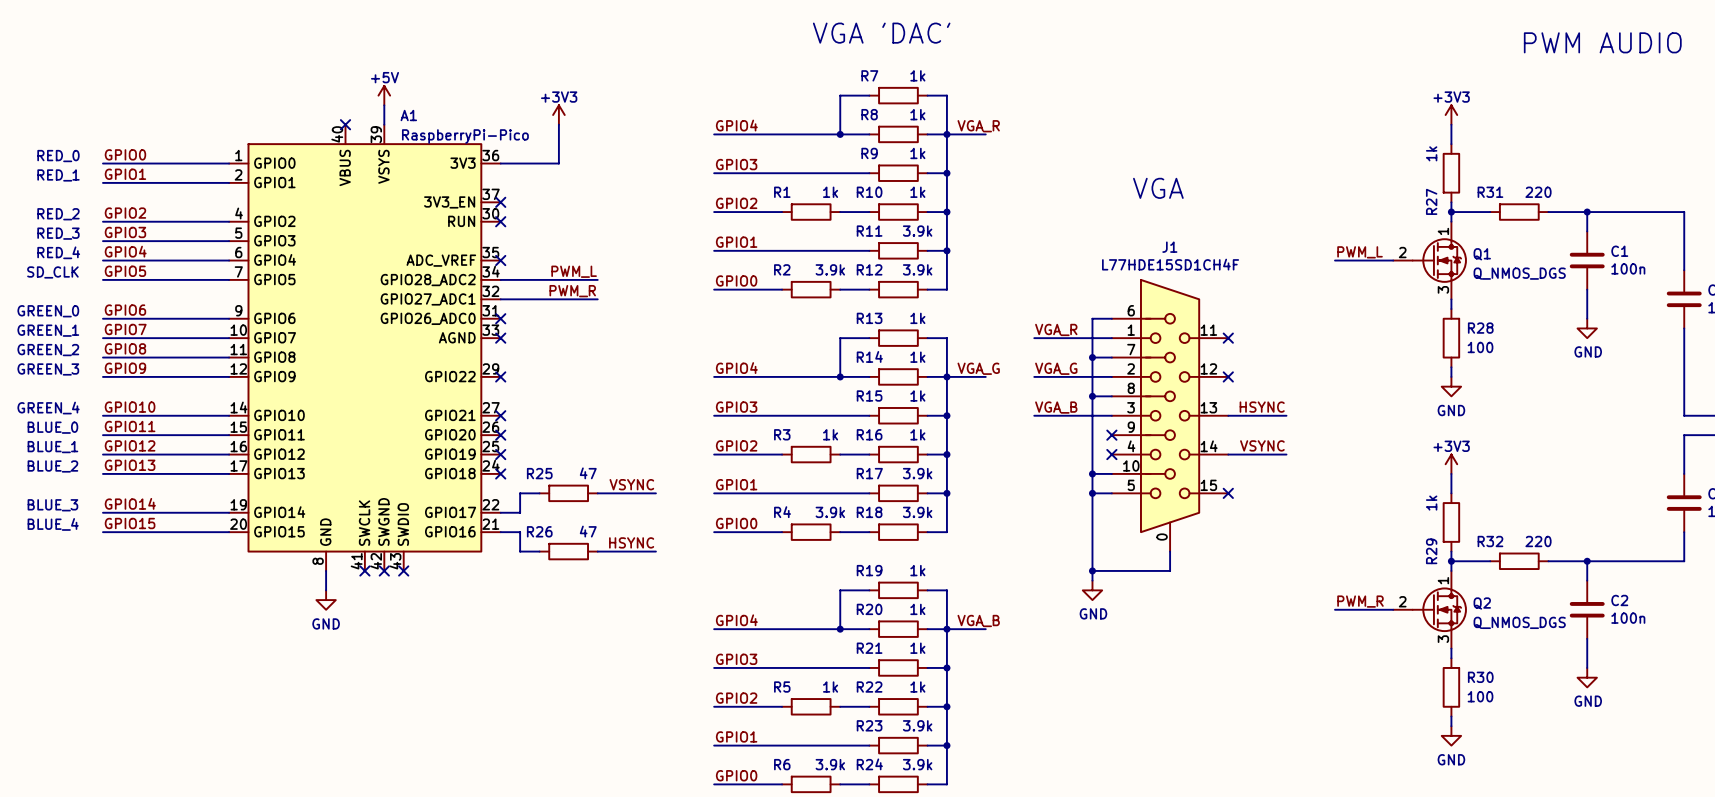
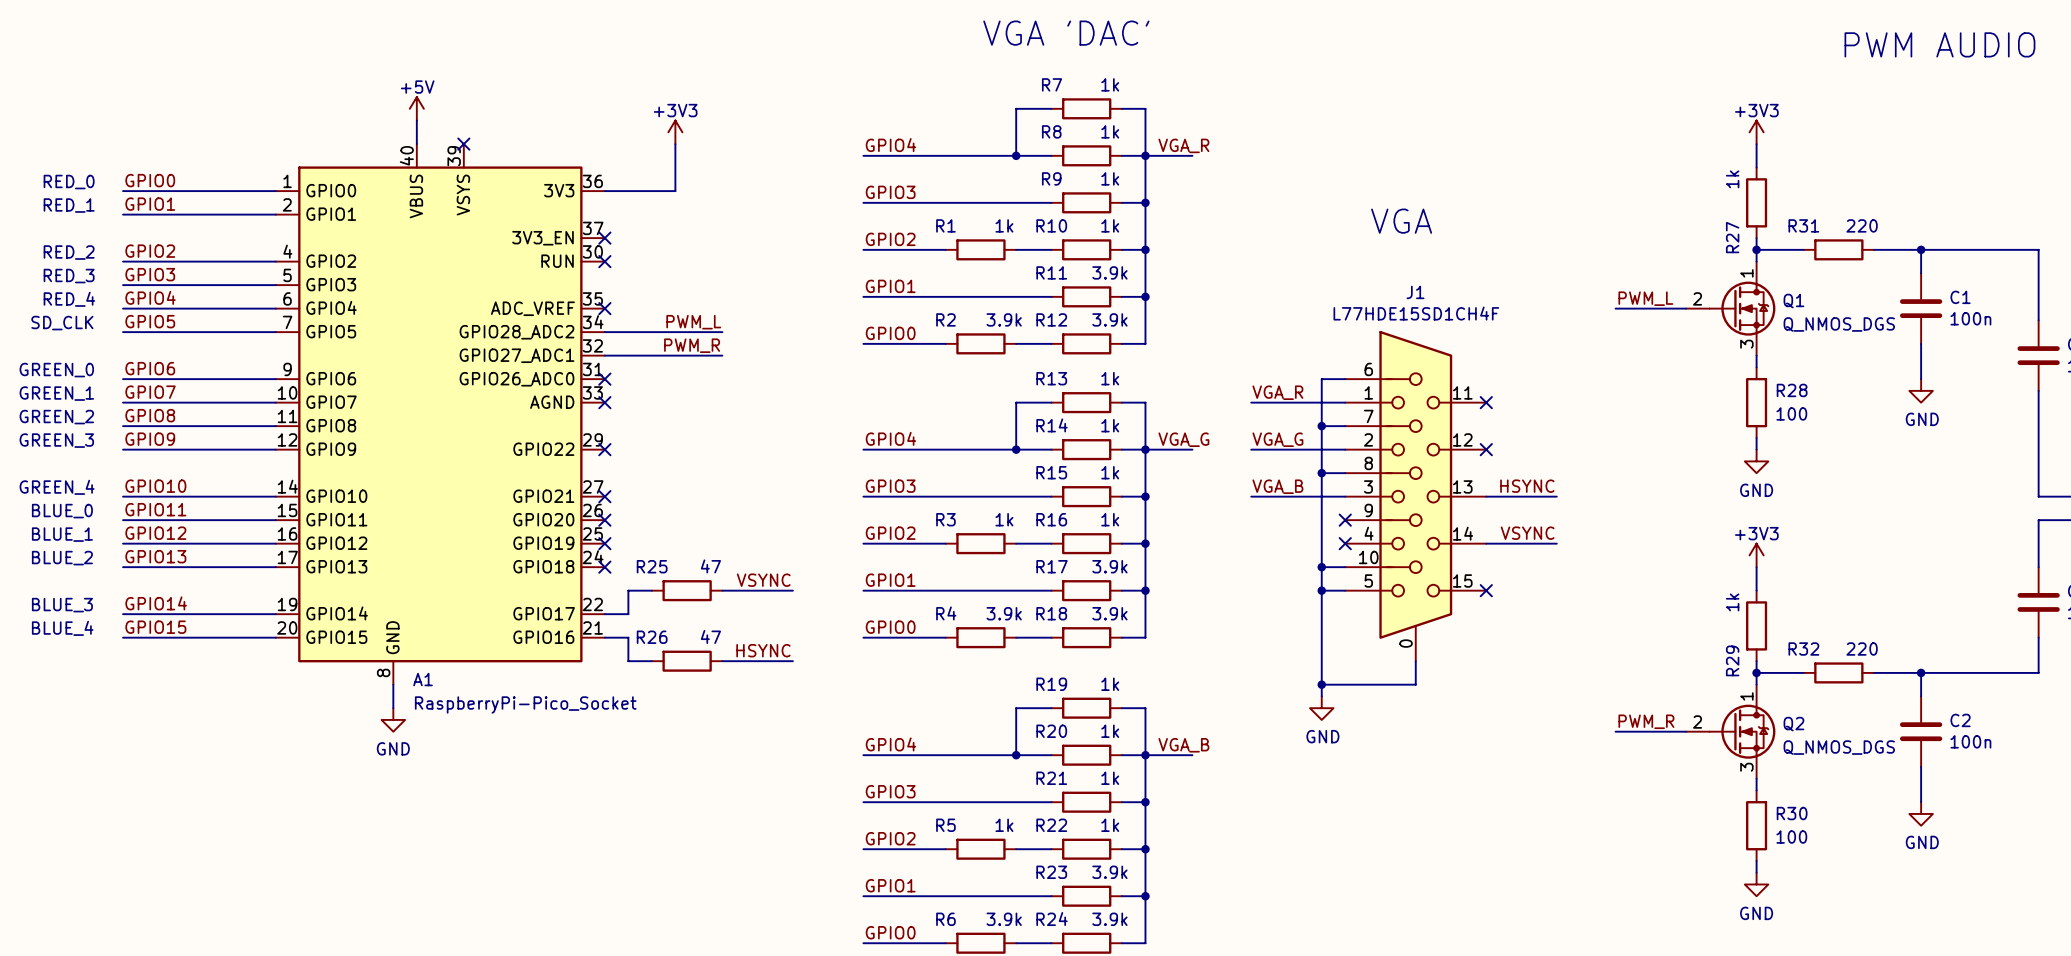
power symbol position: +5V (384, 95) -> +5V (416, 108)
wire: (384, 105) (384, 124) -> (416, 120) (416, 144)
A1 name position: A1 (408, 115) -> A1 (423, 679)
A1 symbol: [229, 124, 501, 571] -> [275, 144, 605, 685]
no-connect mark position: (345, 124) -> (463, 144)
A1 value: RaspberryPi-Pico (465, 136) -> RaspberryPi-Pico_Socket (525, 704)
no-connect mark: (364, 570) -> none
no-connect mark: (384, 570) -> none
no-connect mark: (403, 570) -> none

